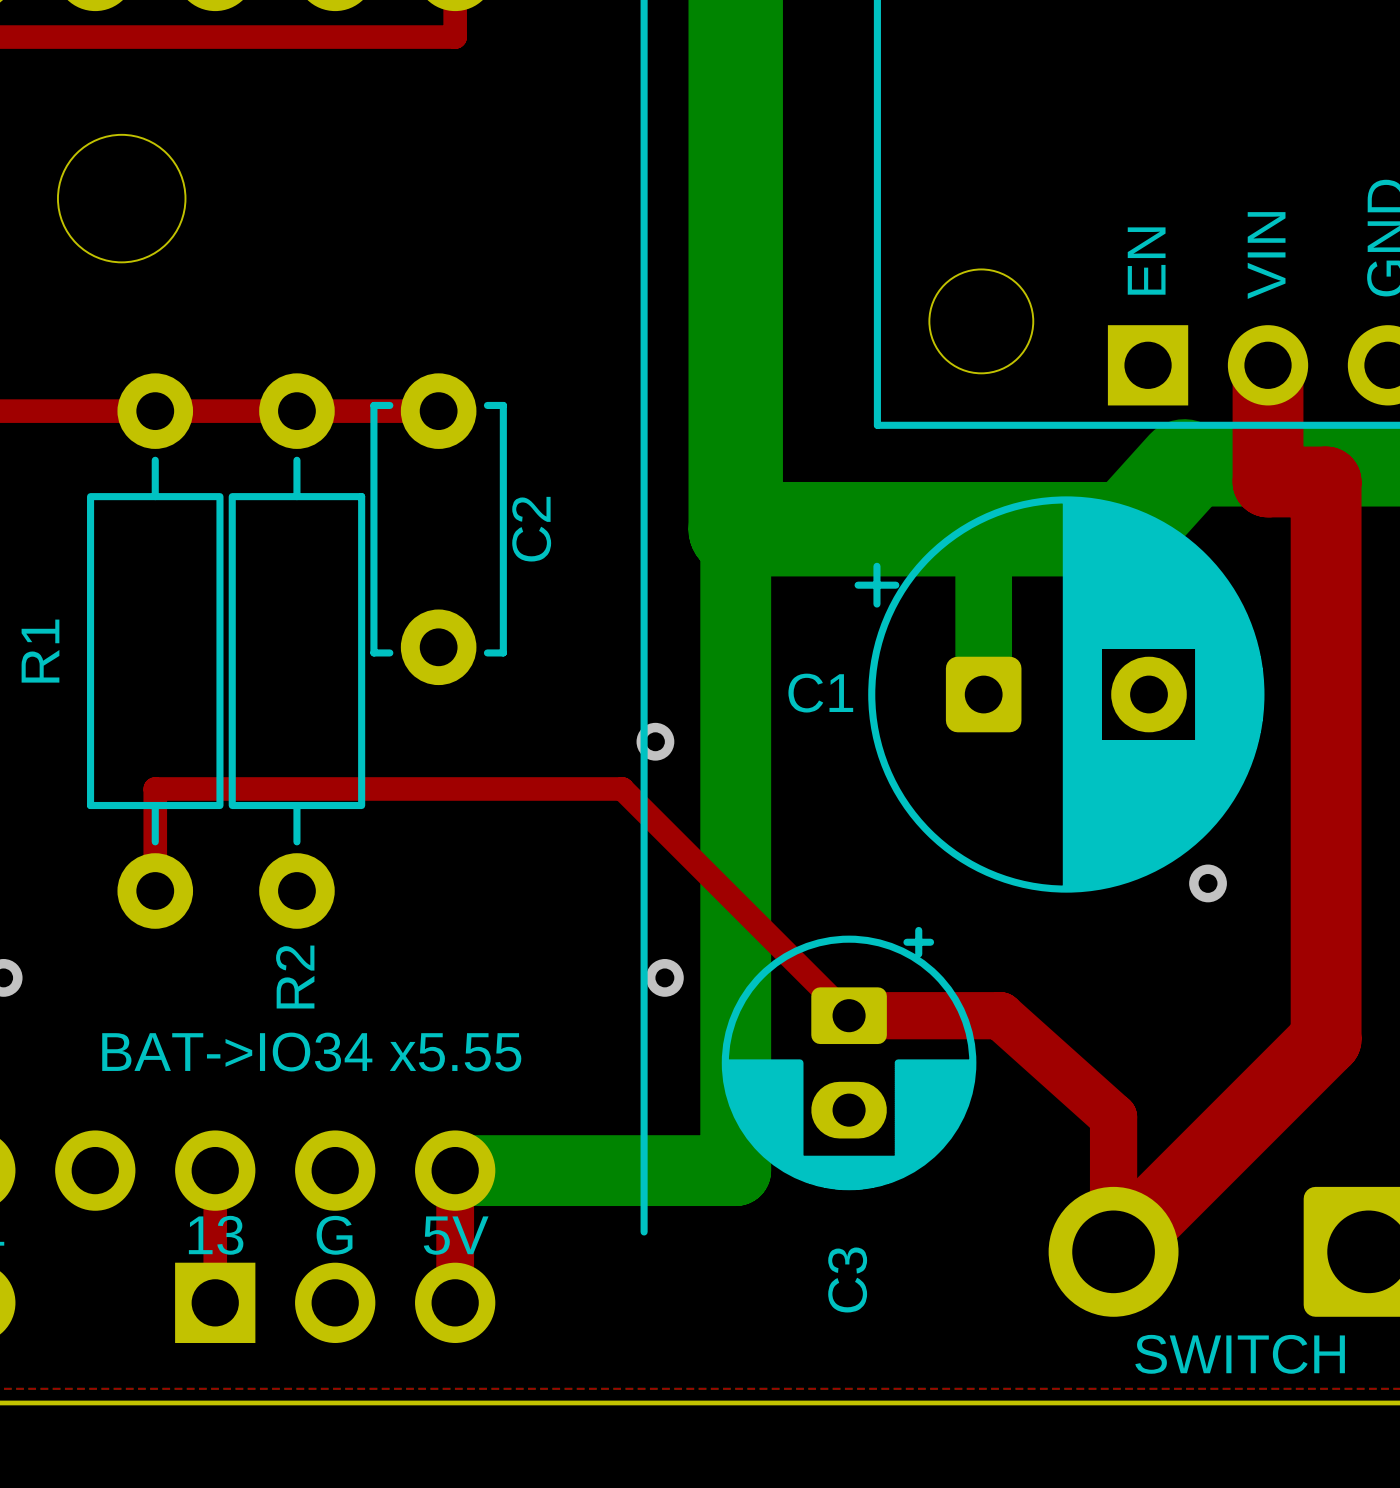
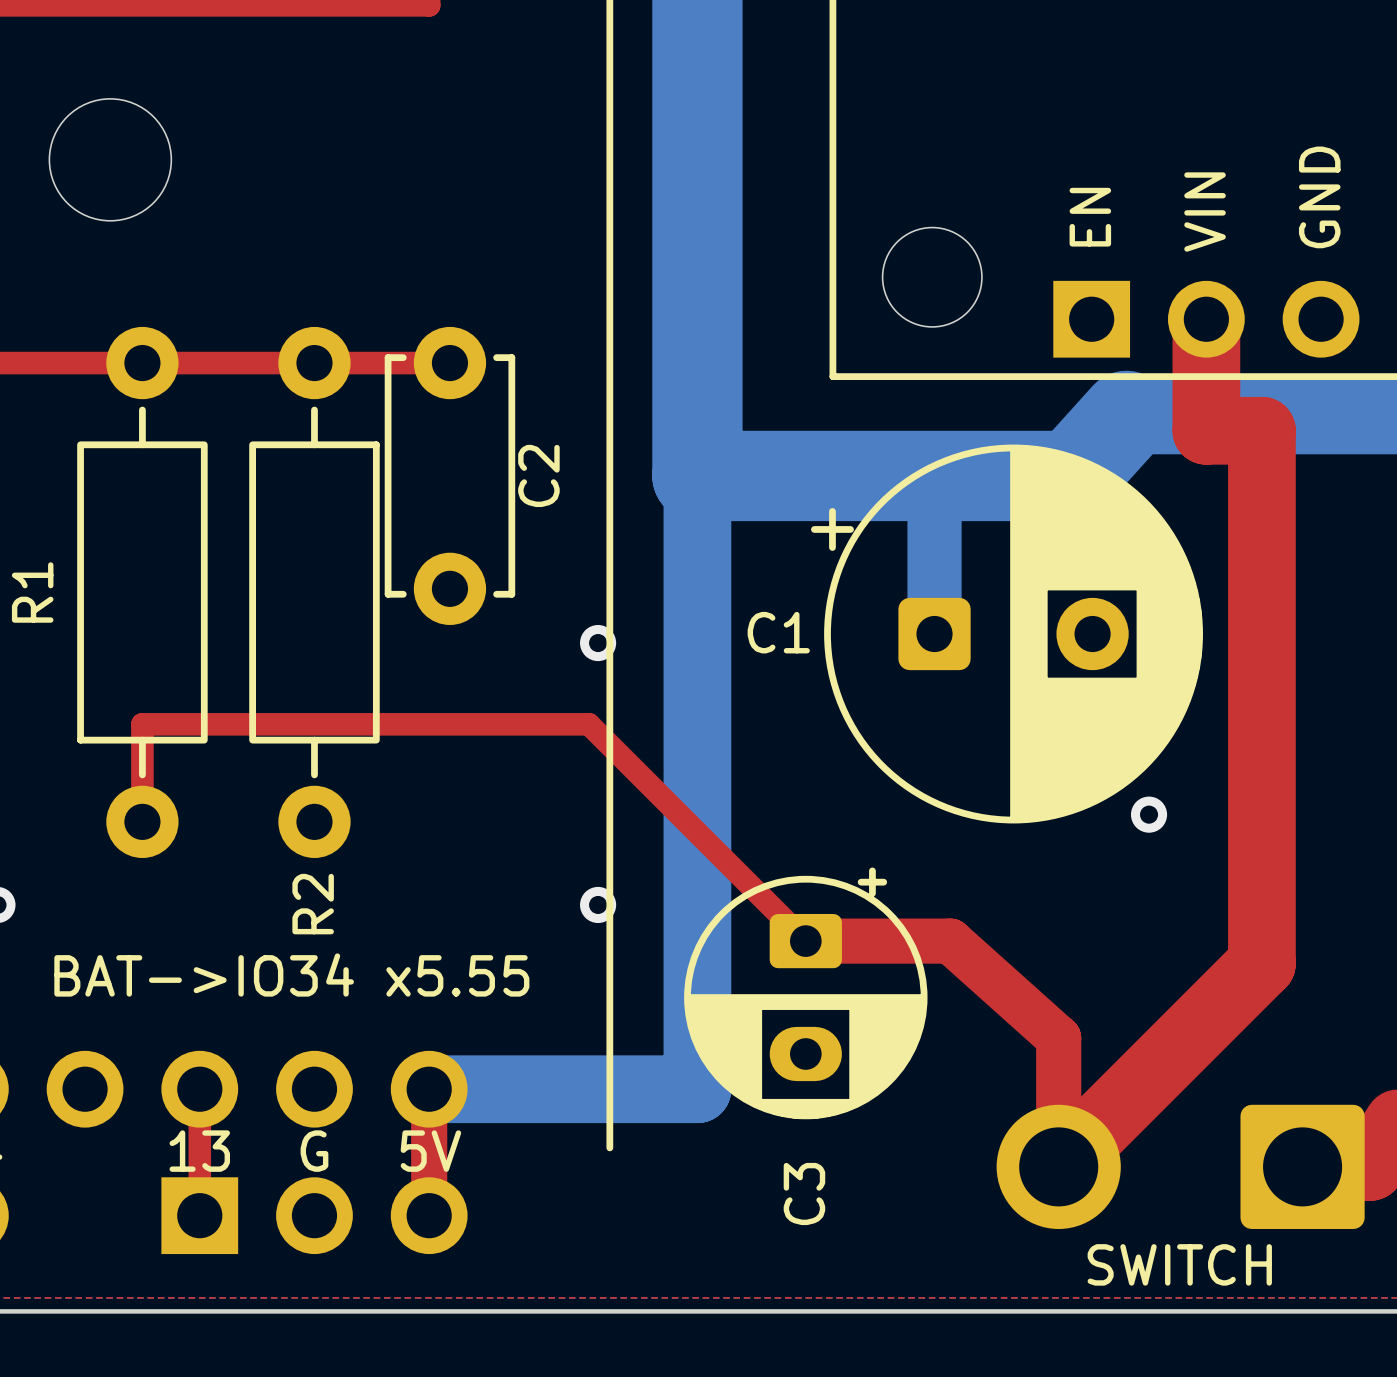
C2 position: (438, 529) -> (449, 475)
R2 position: (296, 651) -> (314, 592)
via position: (655, 741) -> (598, 643)
C3 footprint: [721, 926, 977, 1191] -> [684, 867, 928, 1120]
via position: (664, 977) -> (598, 904)

